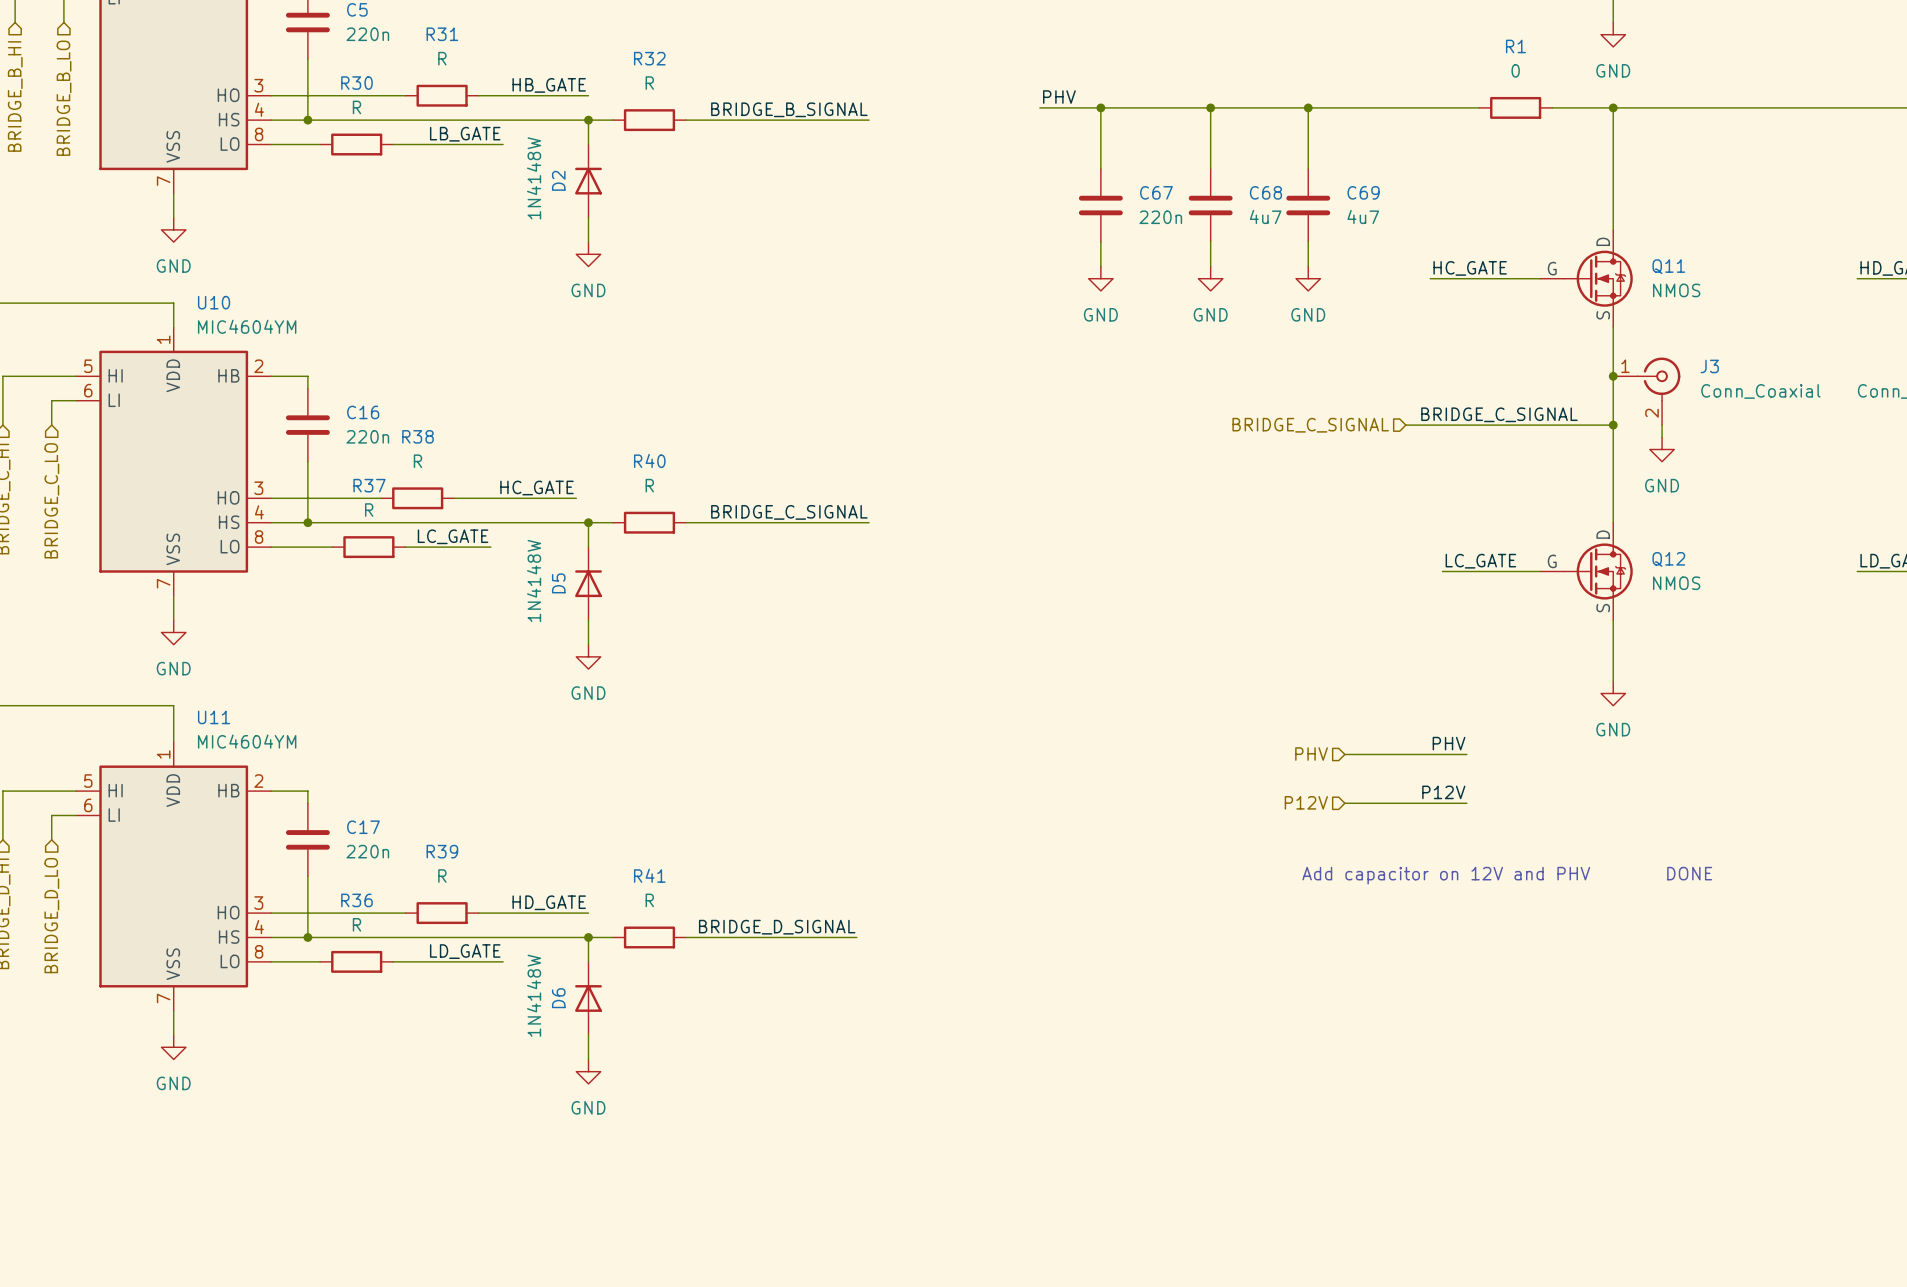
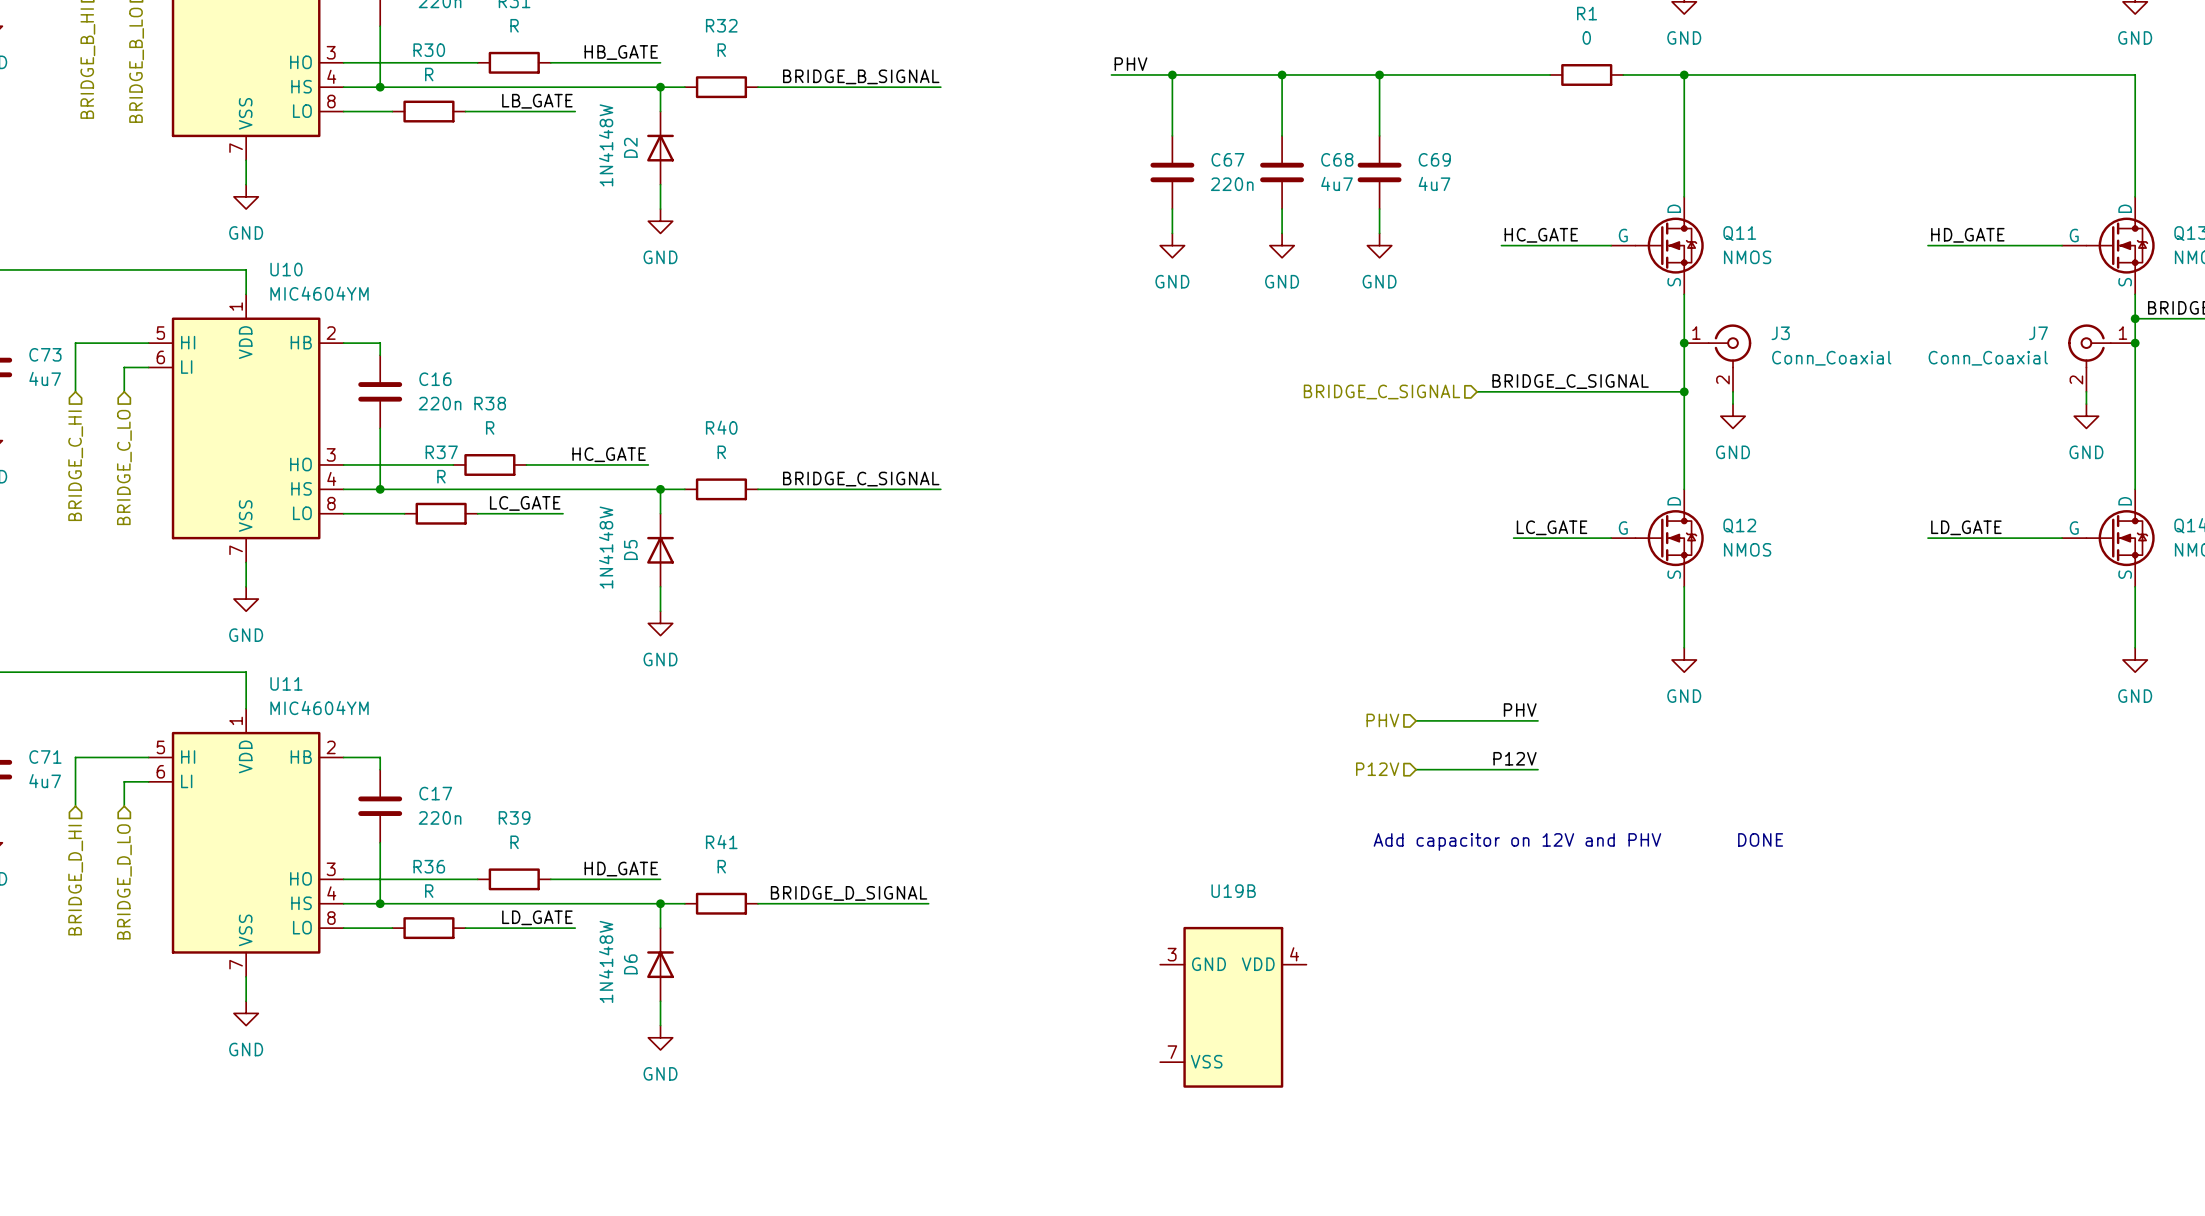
U19B: none -> (1233, 1007)

